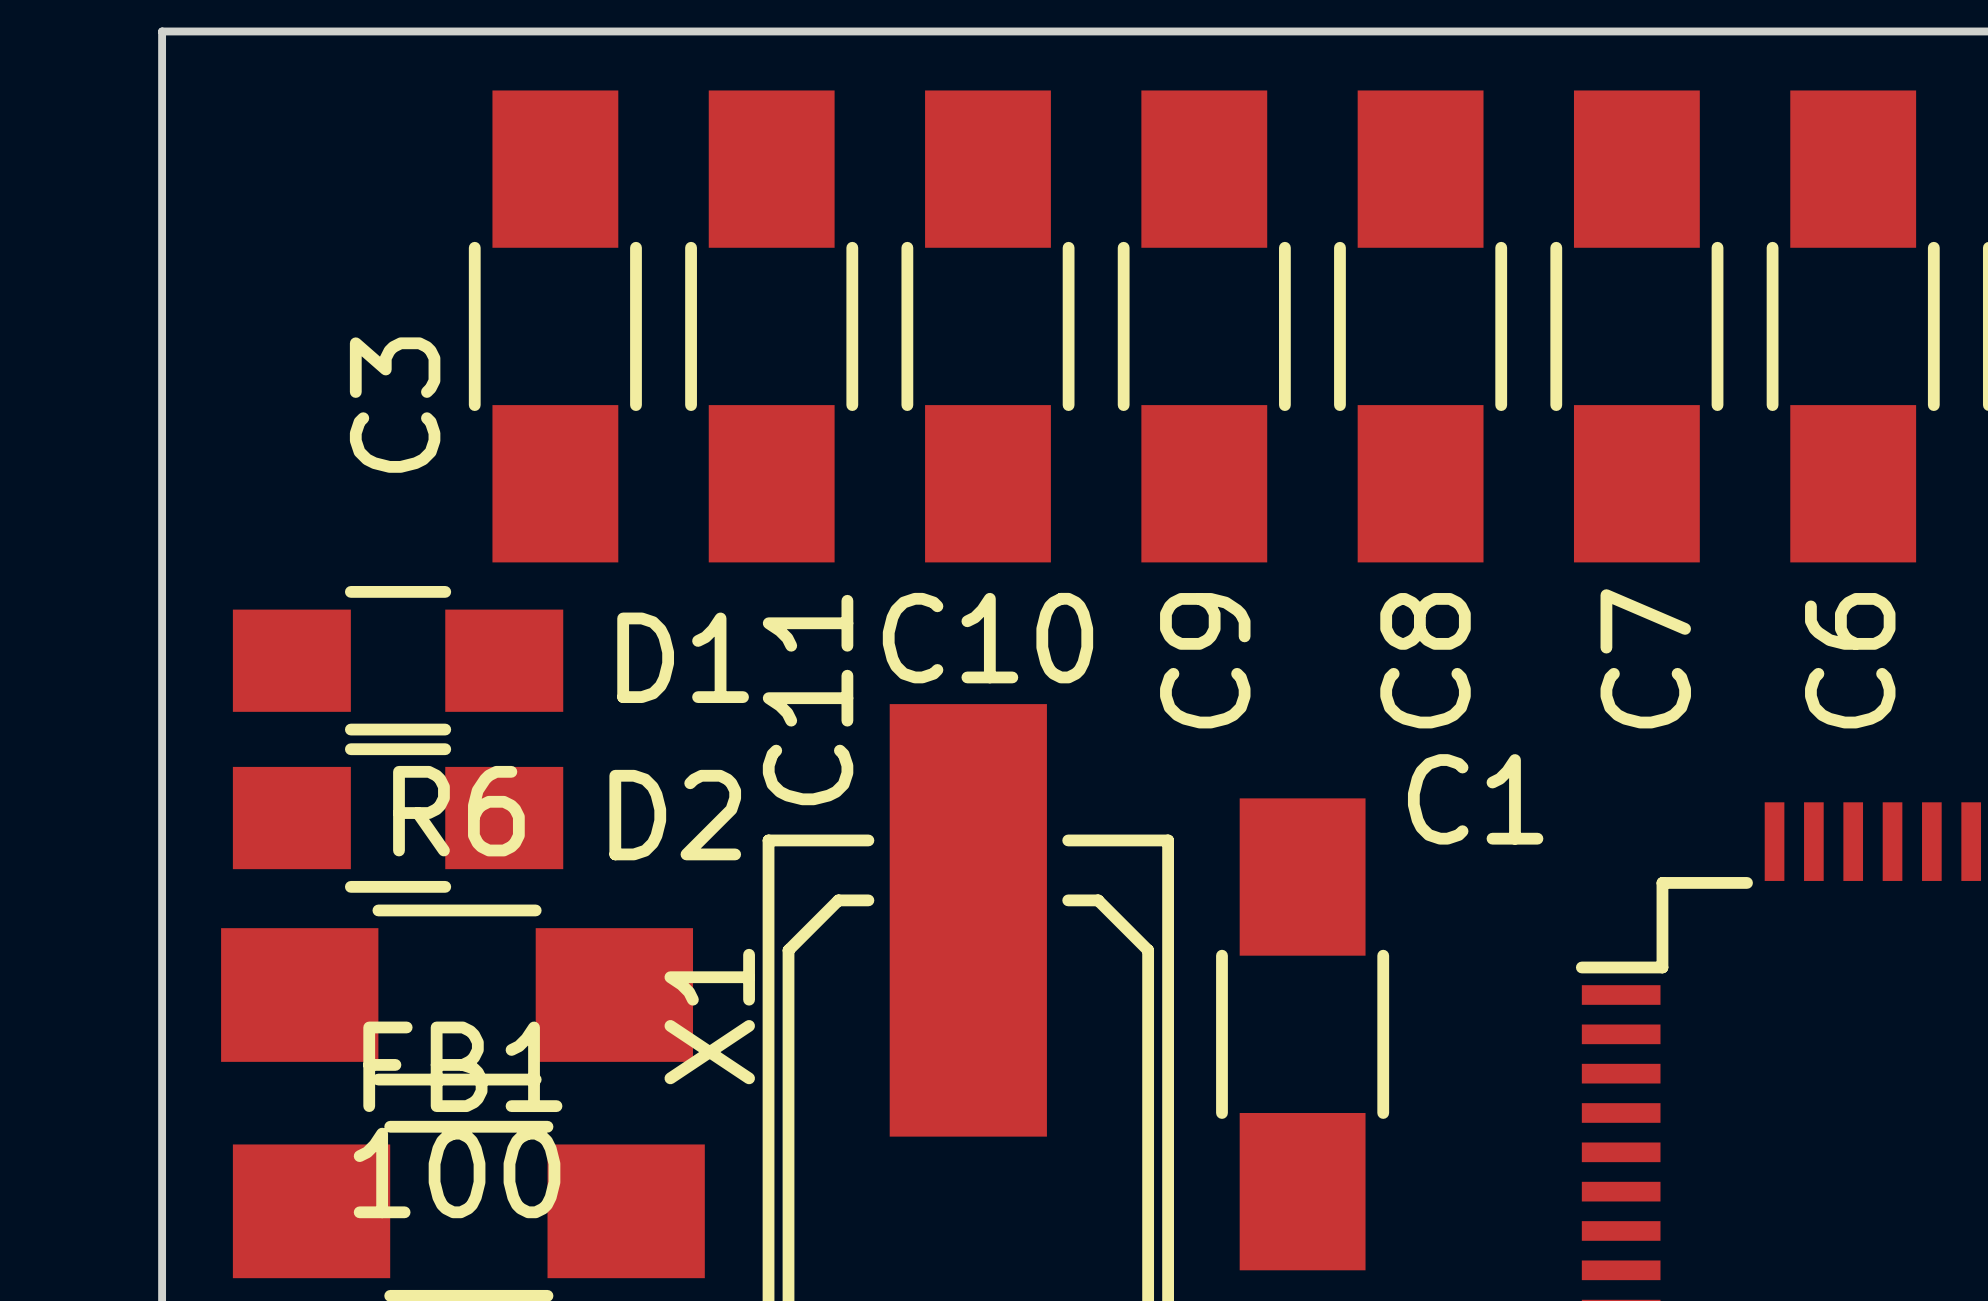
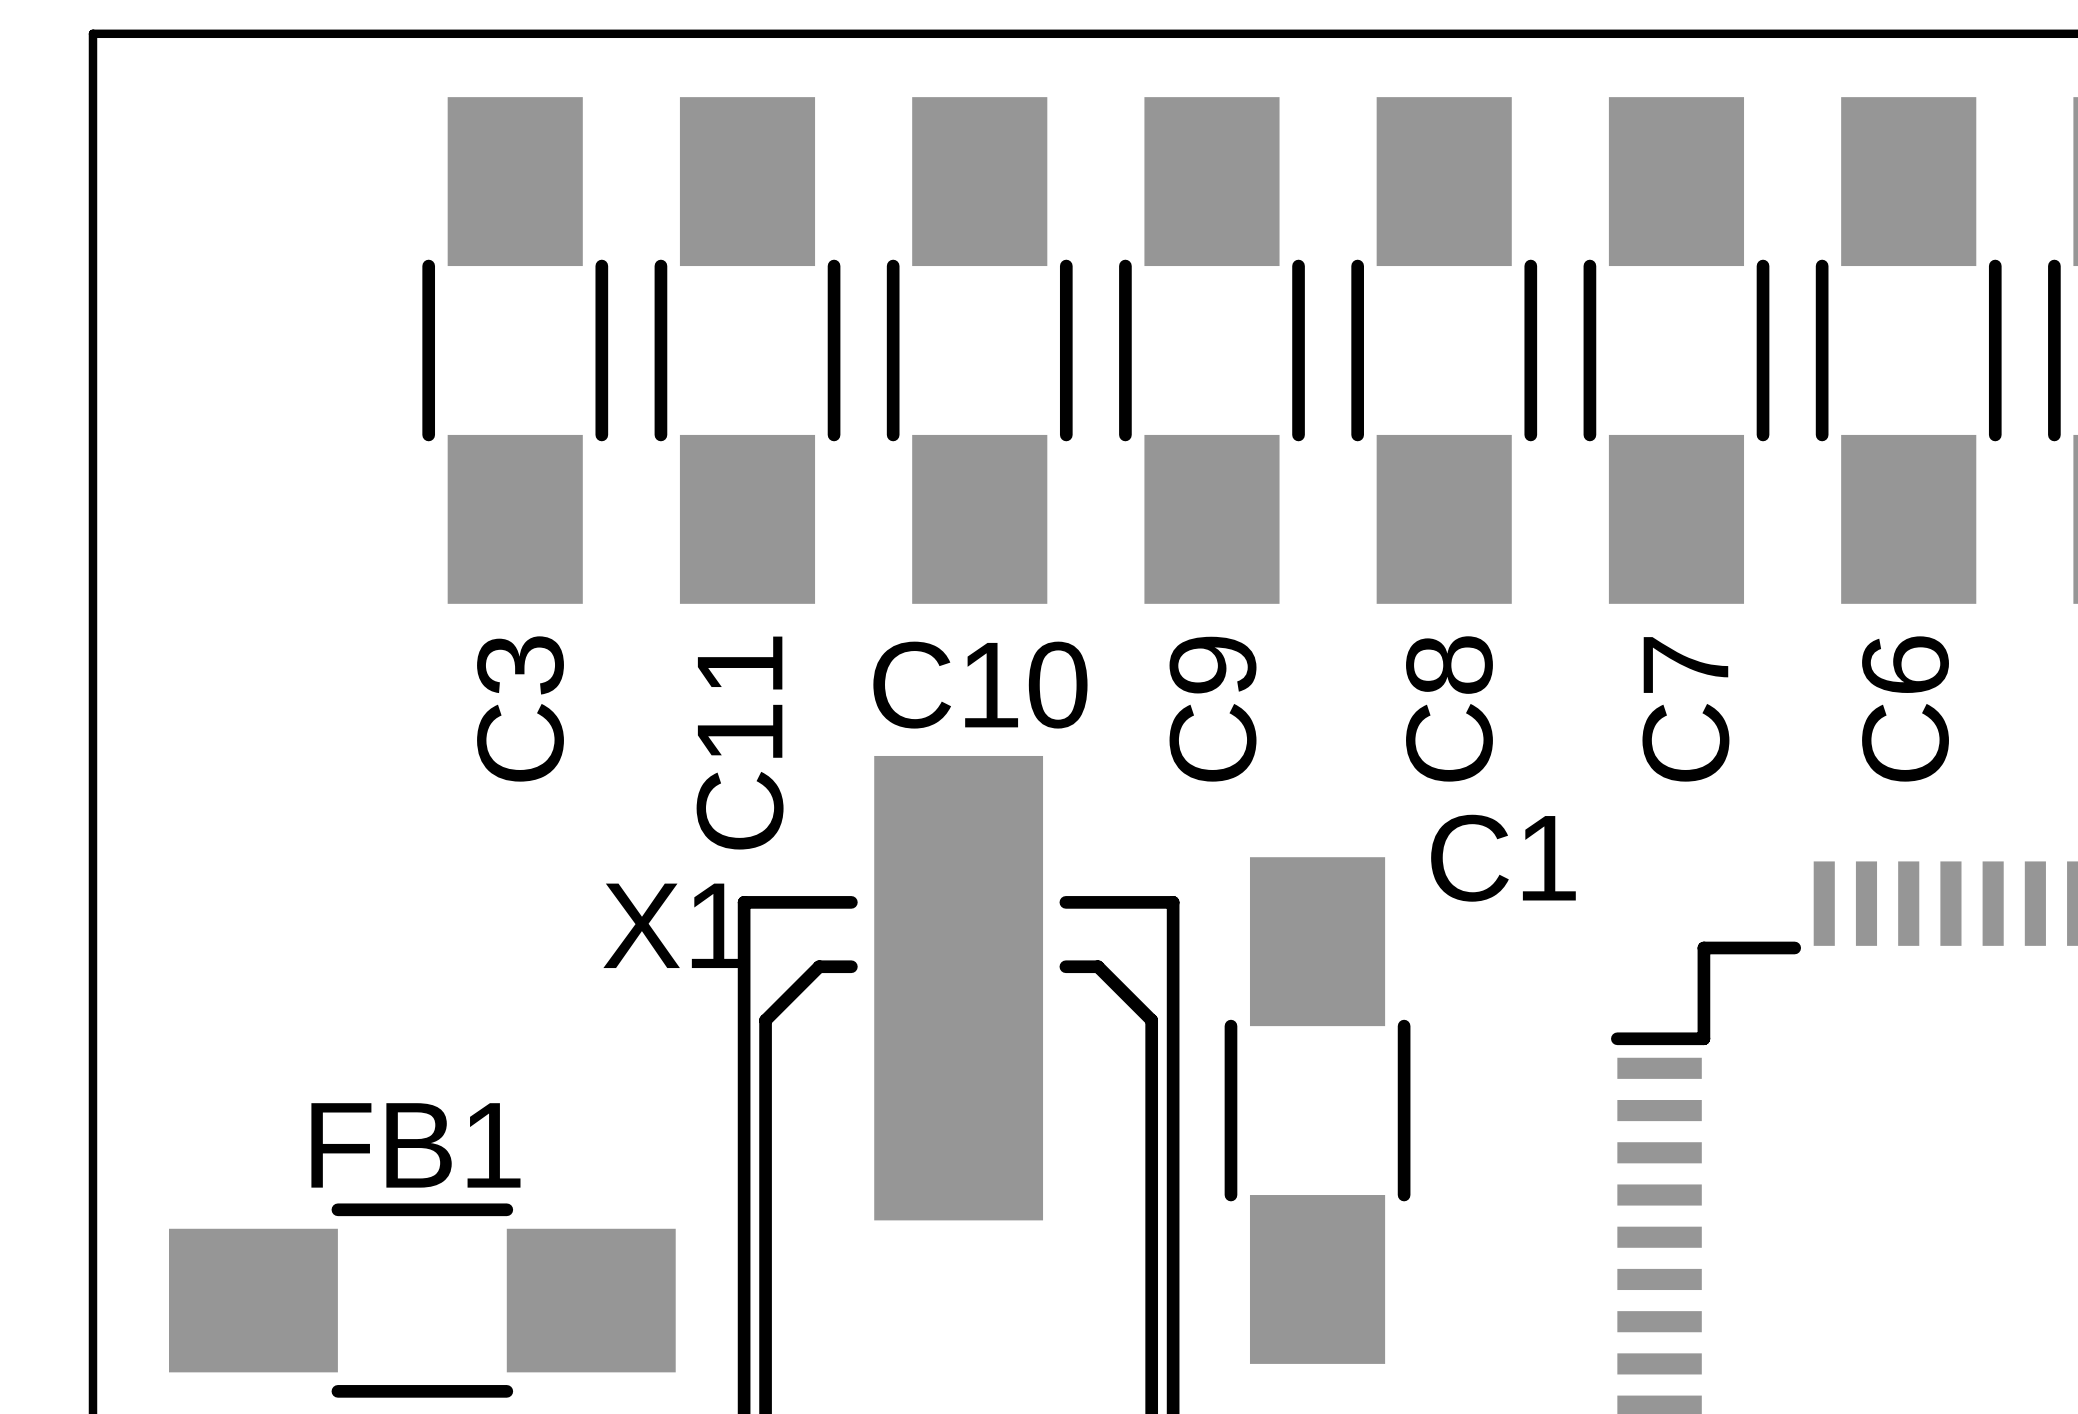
C3 name position: C3 (395, 405) -> C3 (520, 708)
D1: (398, 660) -> none
C11 name position: C11 (808, 700) -> C11 (740, 743)
D2: (398, 818) -> none
R6: 100 (457, 995) -> none
X1 name rotation: 0° (709, 1016) -> 90° clockwise (674, 925)

